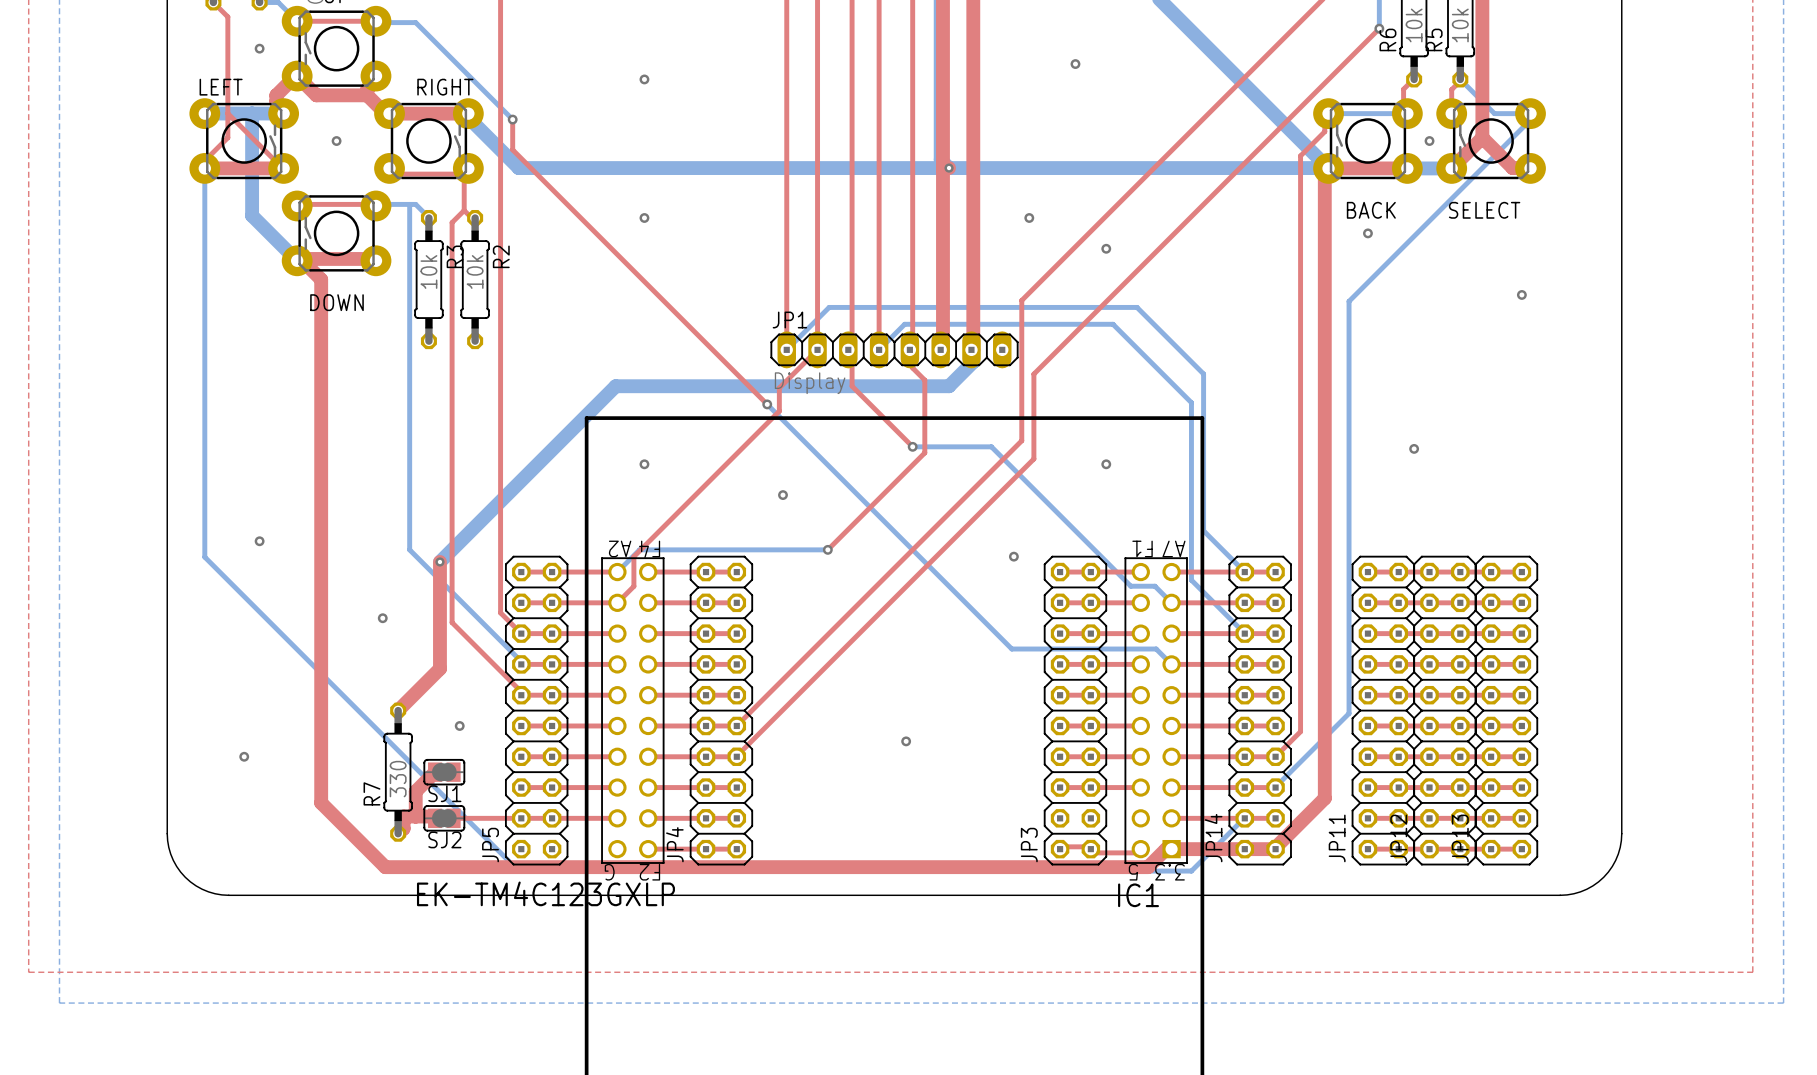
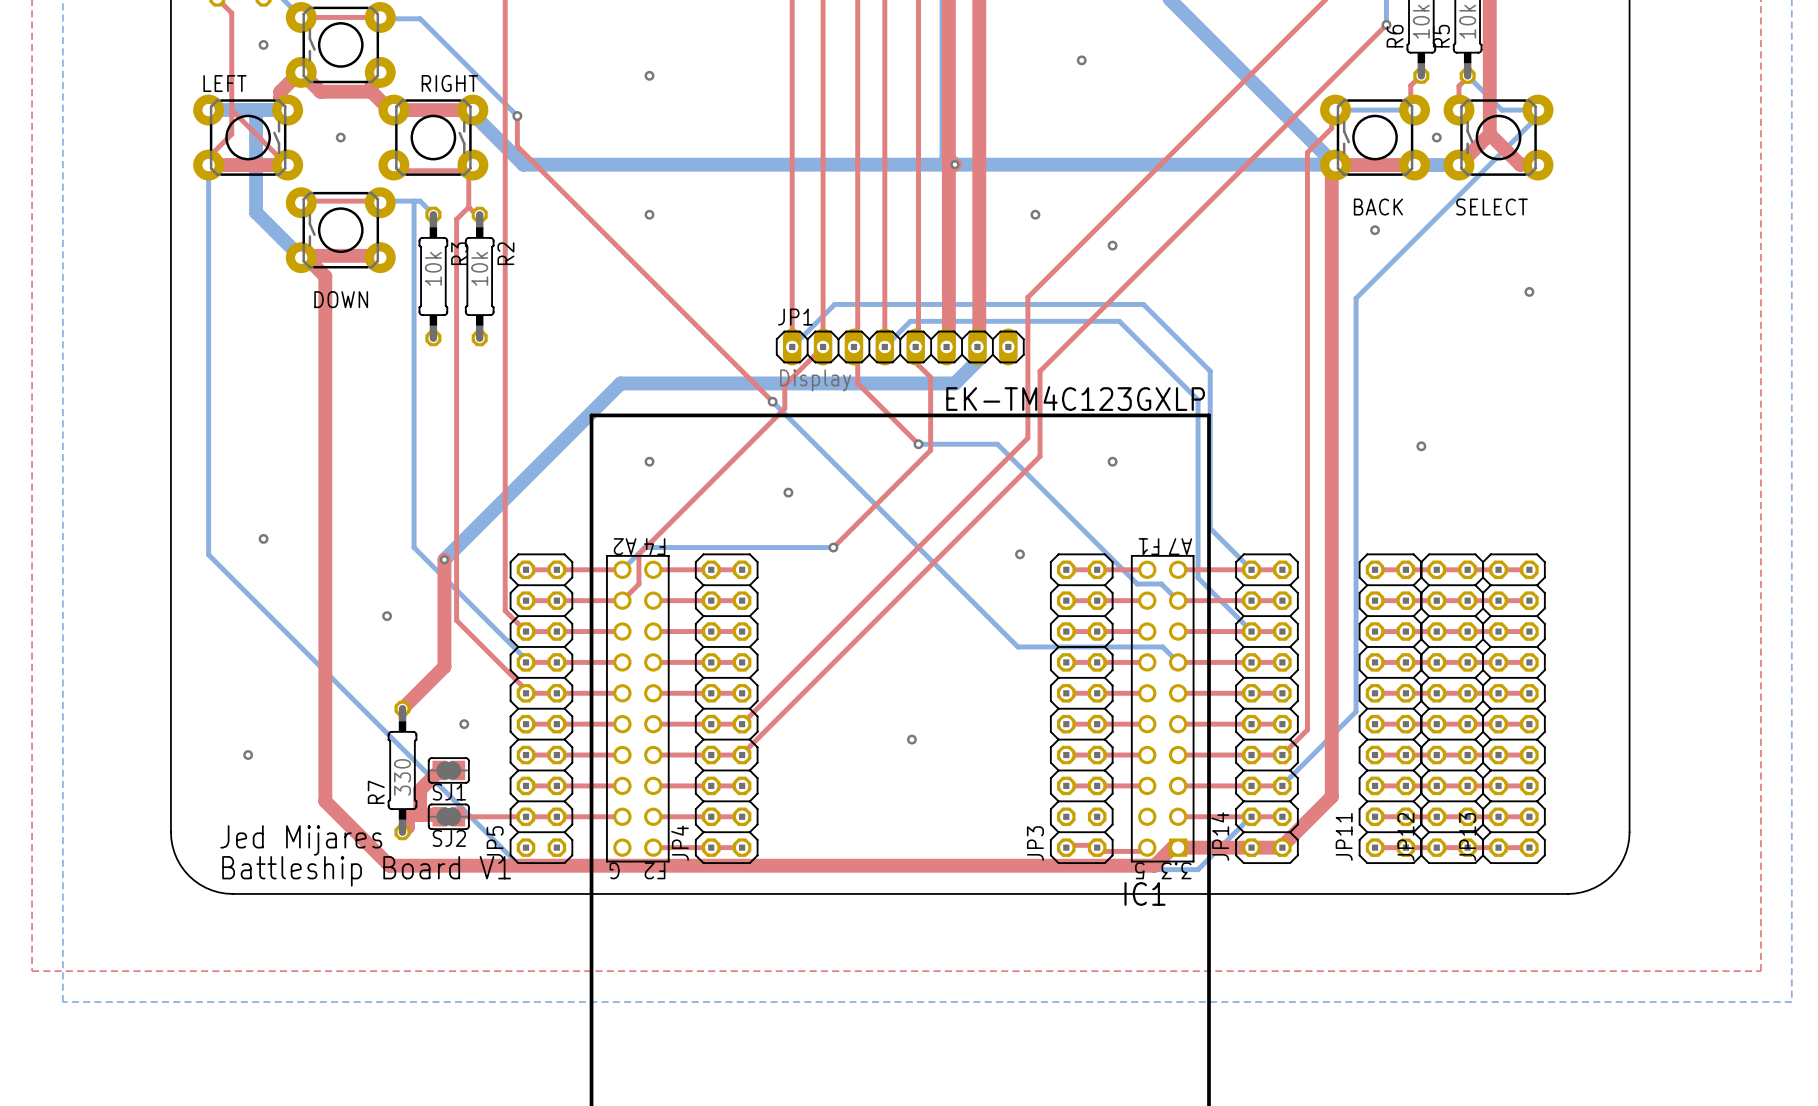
text: none -> Jed Mijares (301, 840)
text: none -> Battleship Board V1 (366, 871)
IC1 value position: EK-TM4C123GXLP (545, 893) -> EK-TM4C123GXLP (1075, 398)

